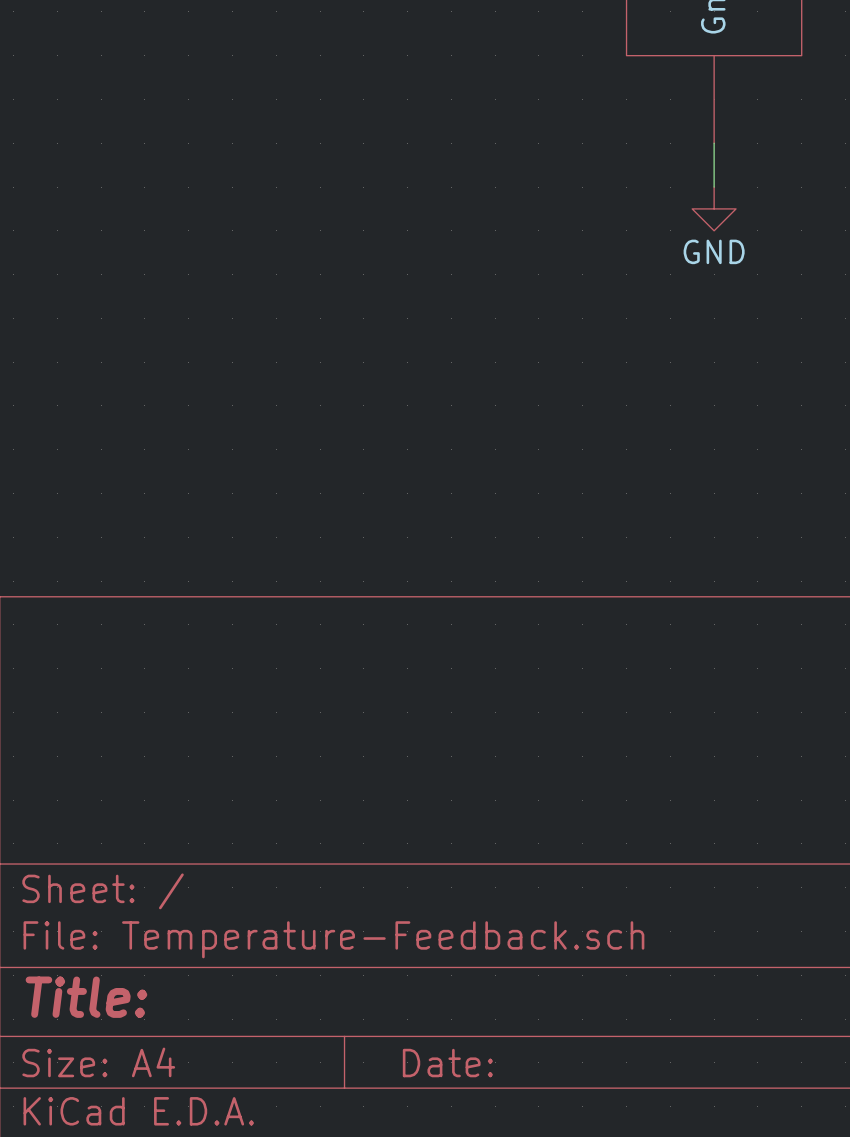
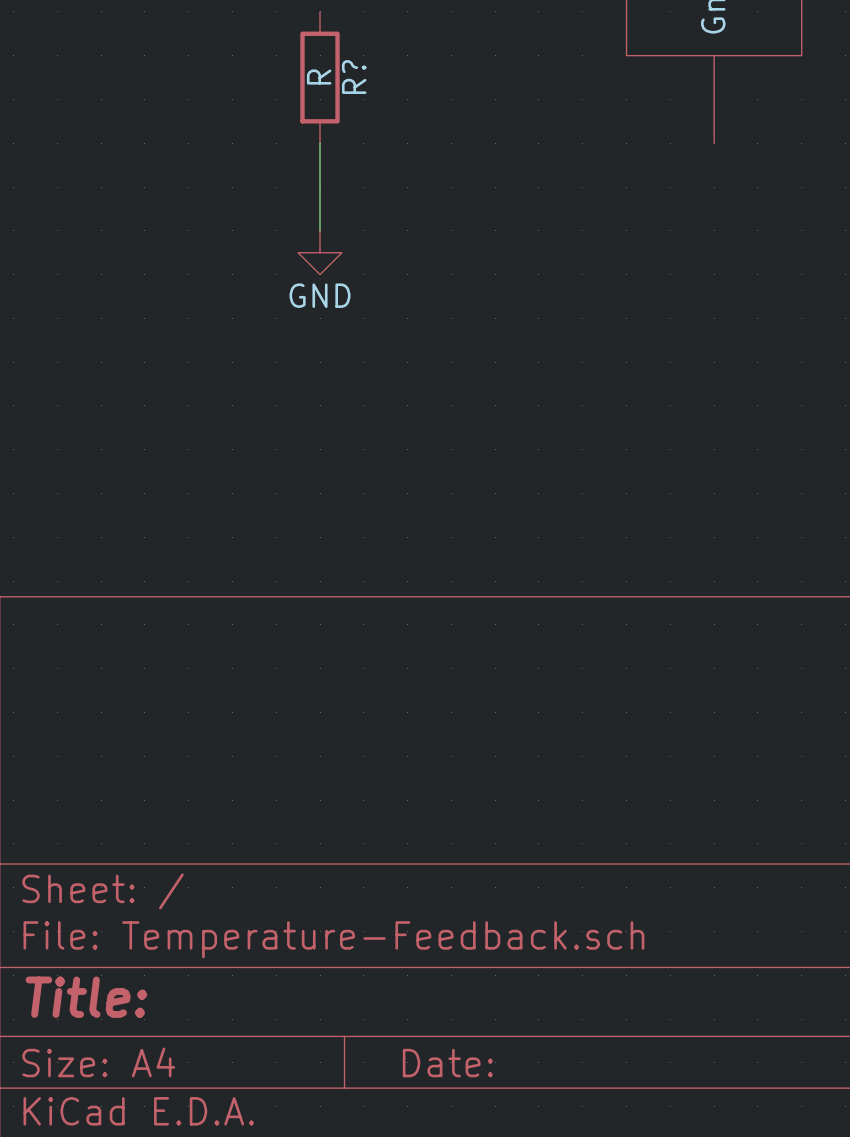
R?: none -> R (320, 77)
wire: none -> (320, 143) (320, 230)
wire: (714, 143) (714, 187) -> none
power symbol: GND (714, 208) -> none
power symbol: none -> GND (320, 252)

